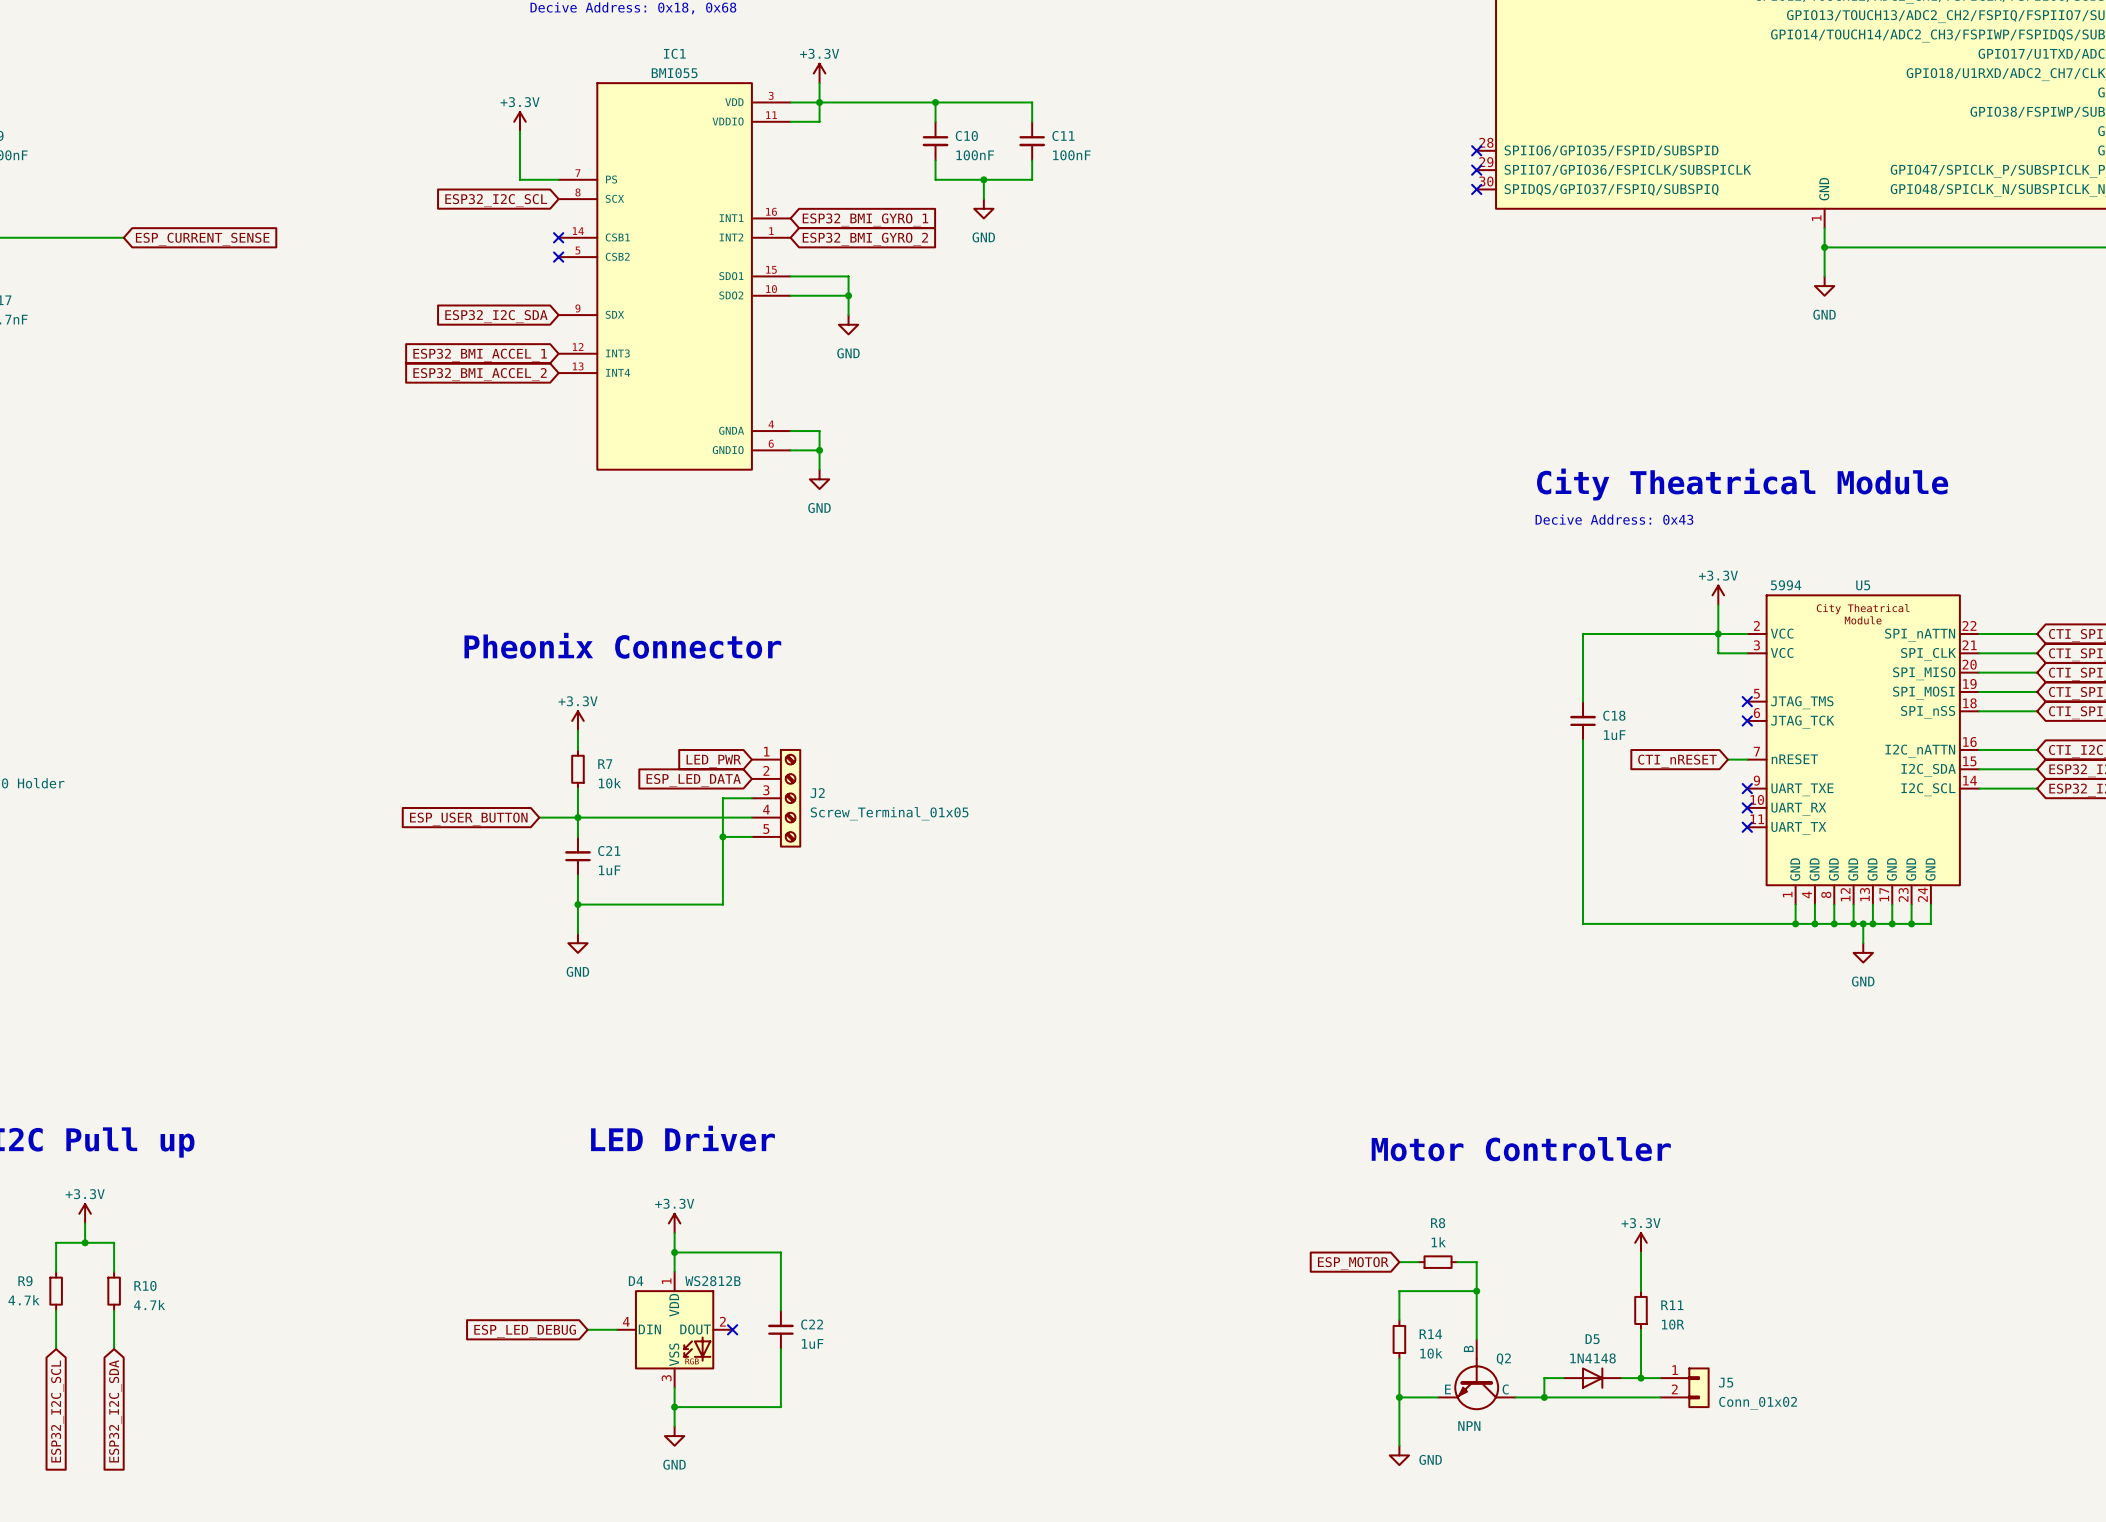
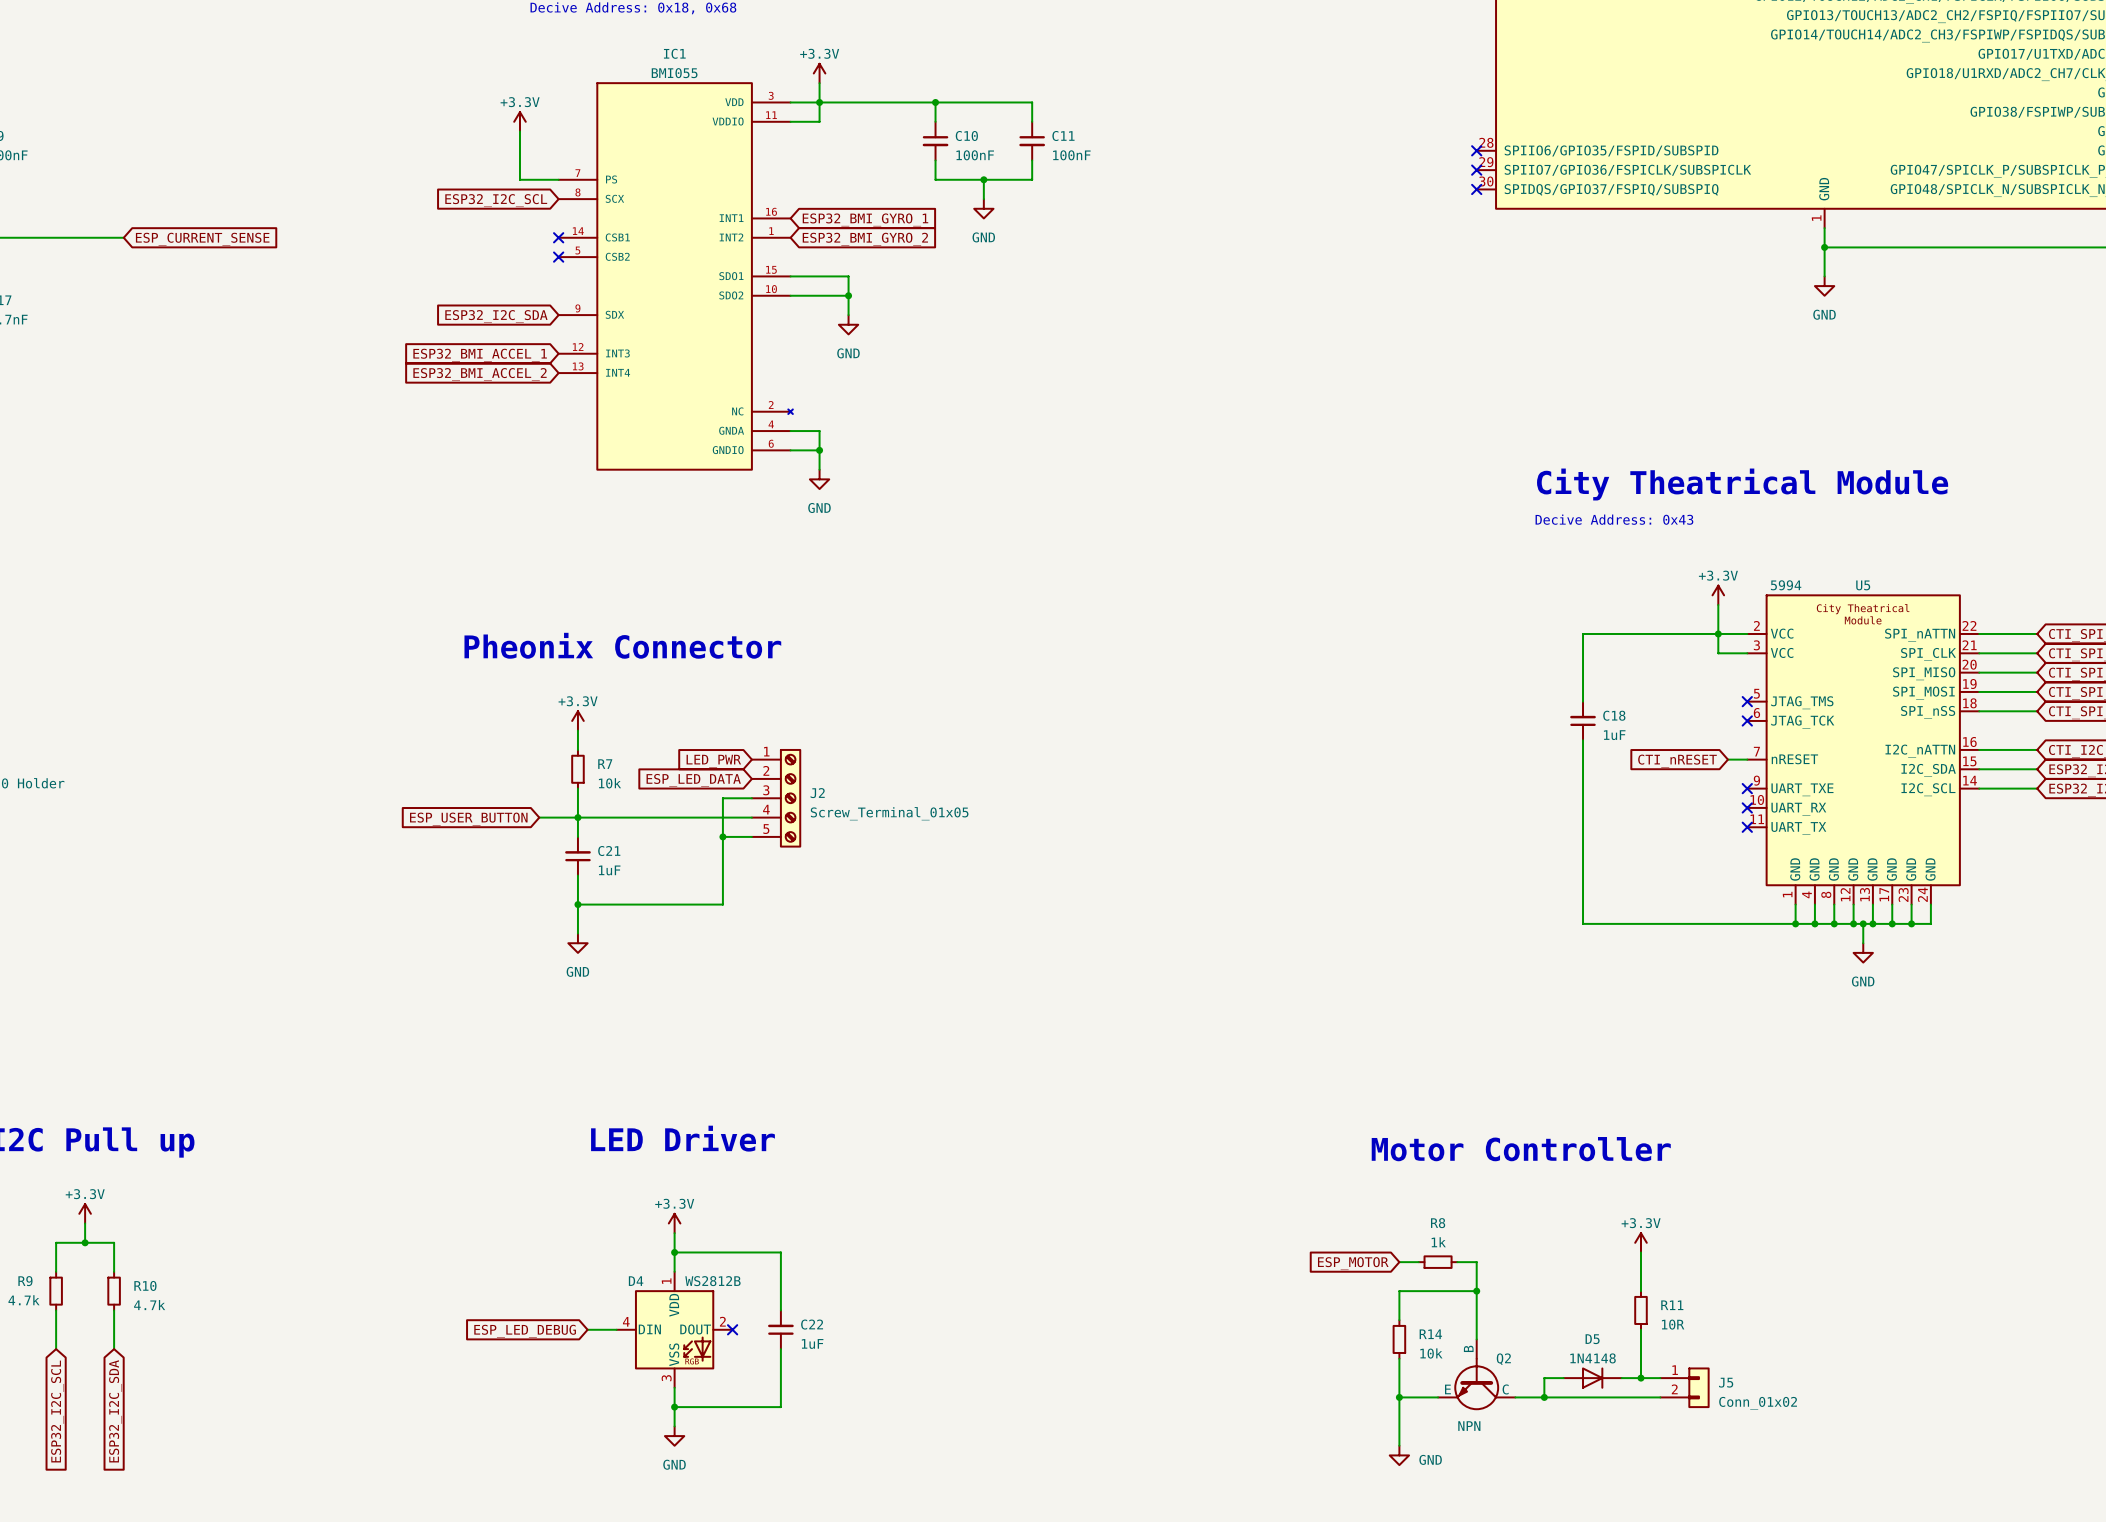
IC1 symbol: [558, 83, 791, 470] -> [558, 83, 793, 470]

